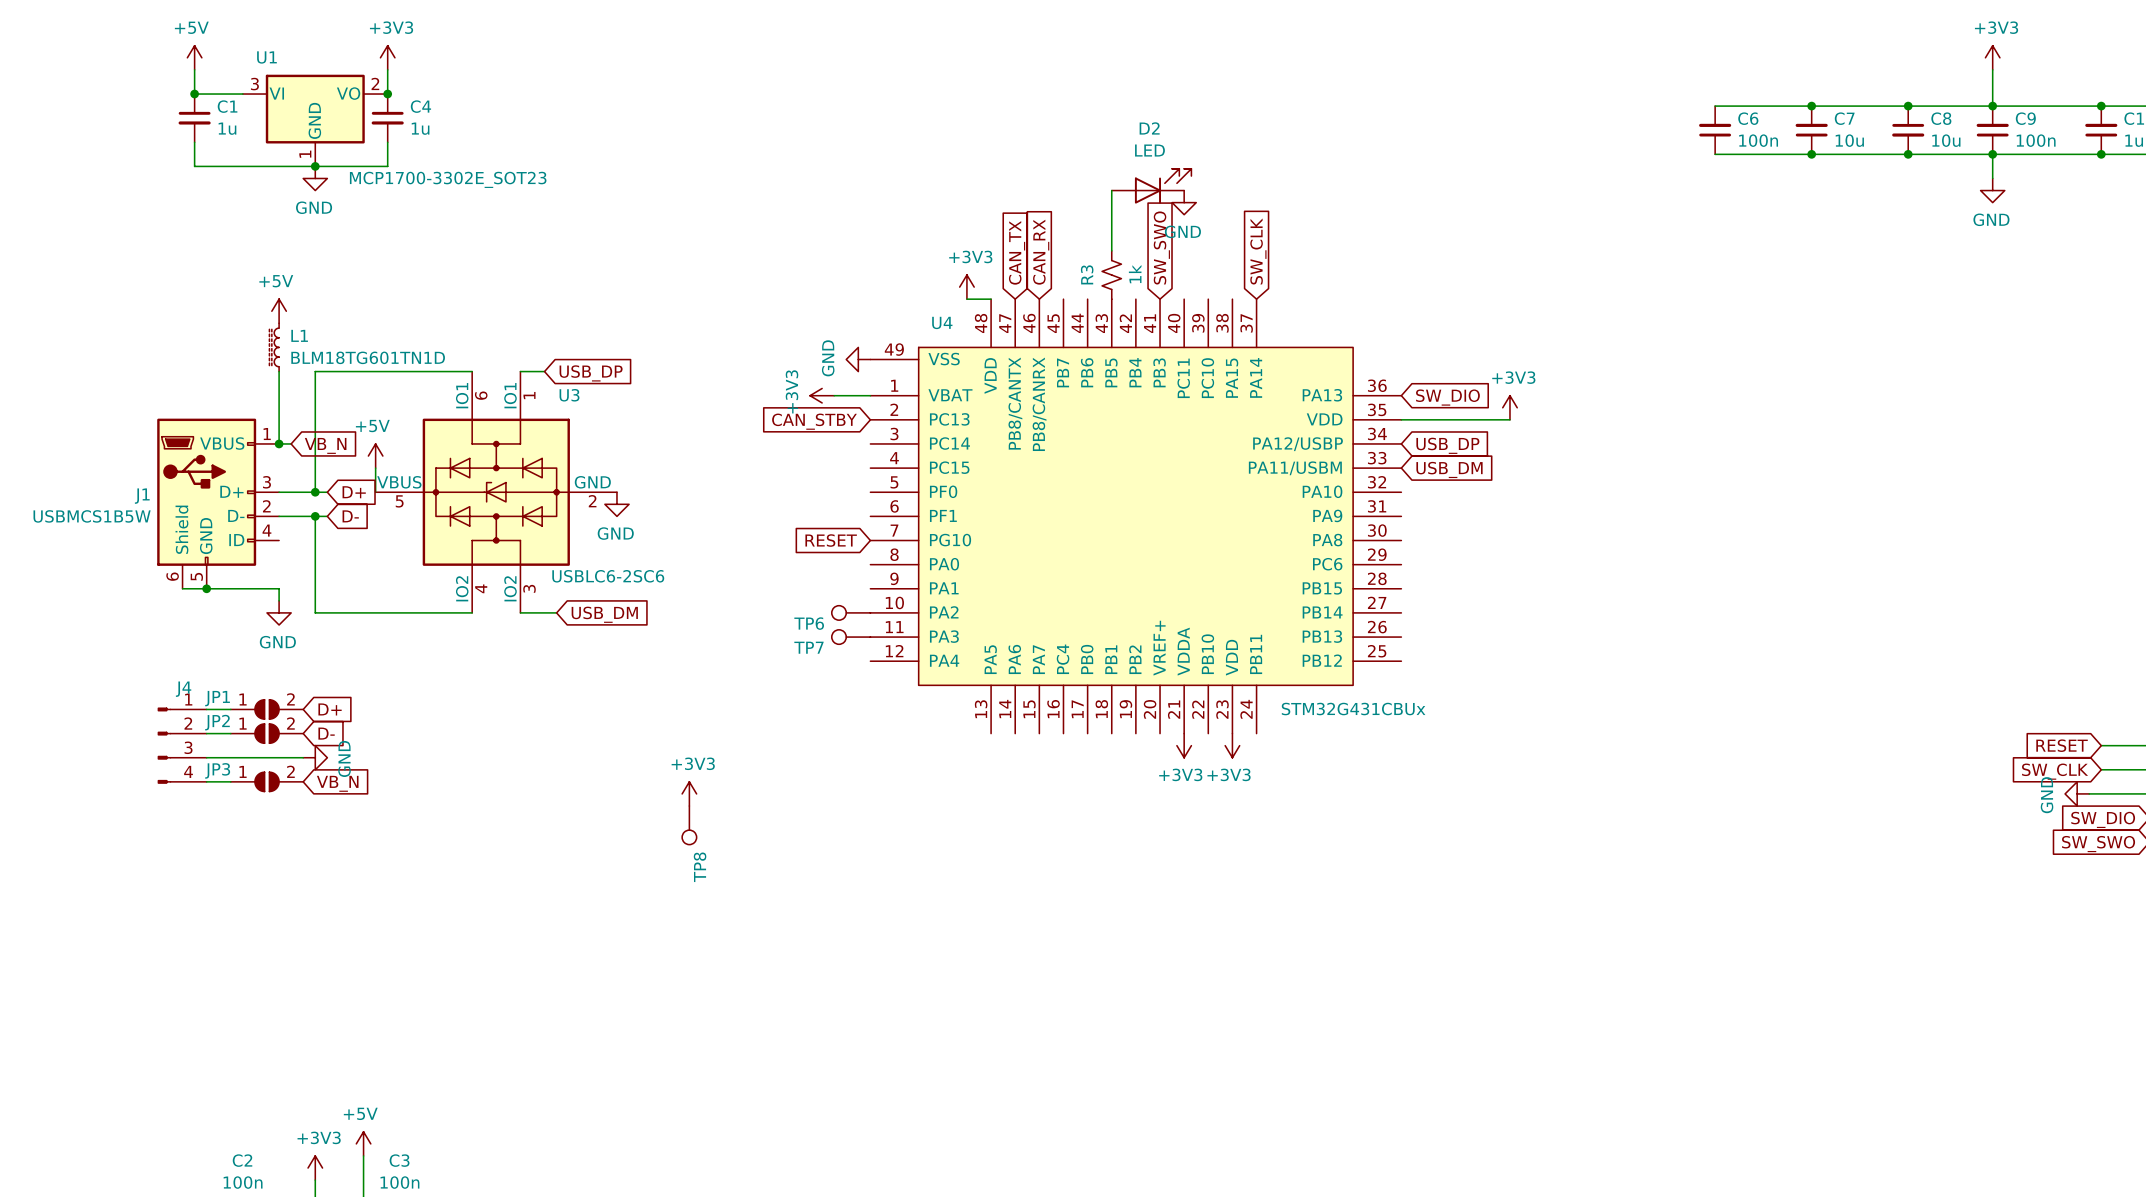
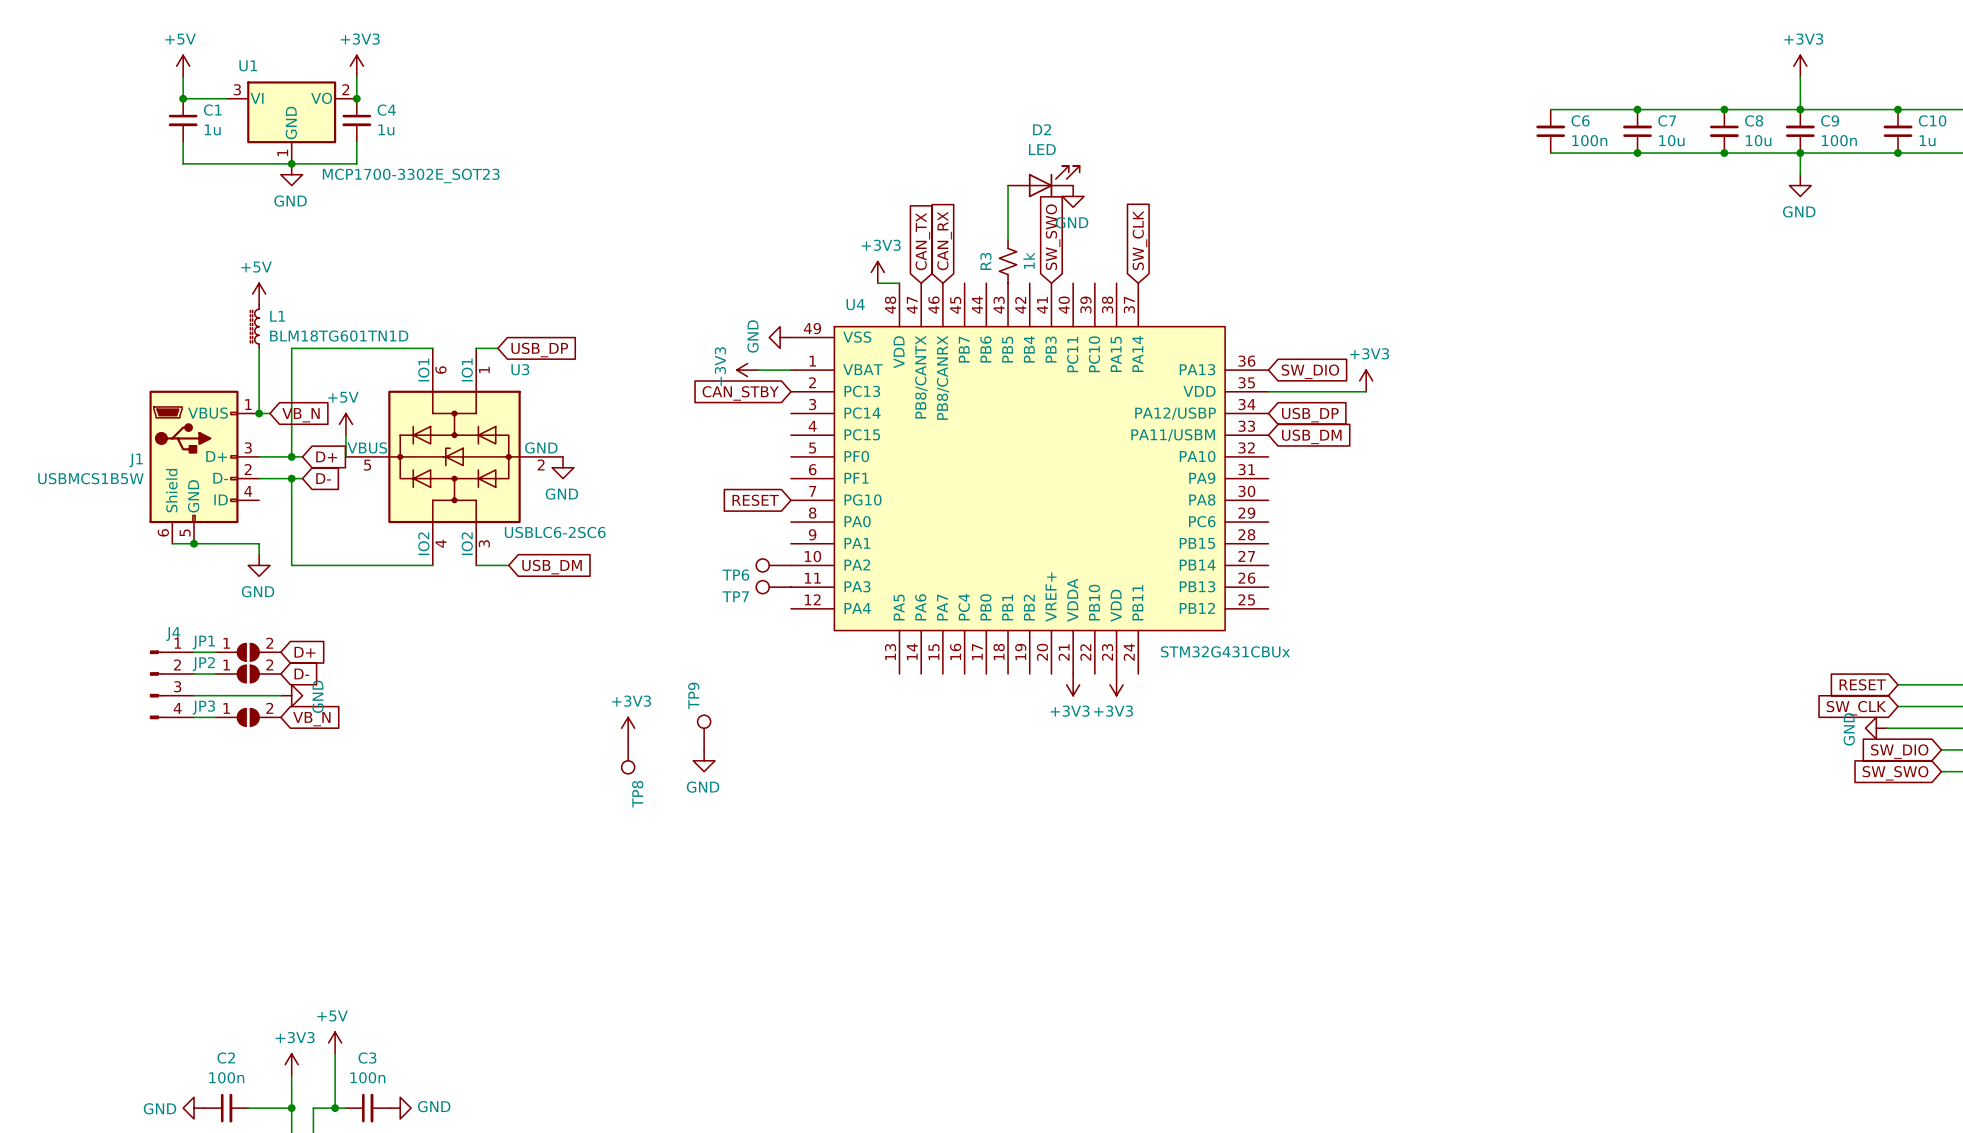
TP9: none -> (704, 732)
power symbol: none -> GND (704, 760)

